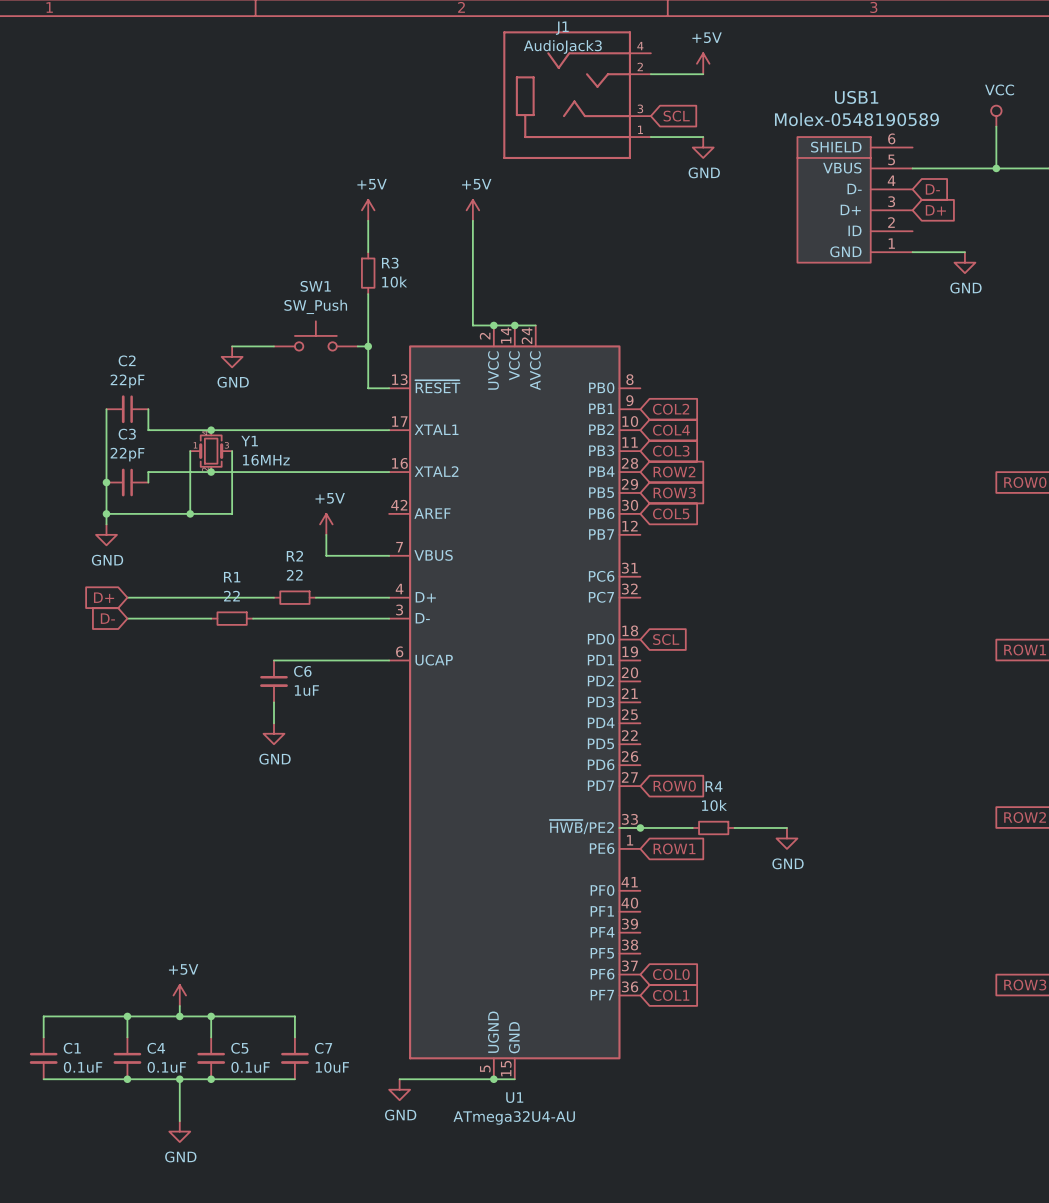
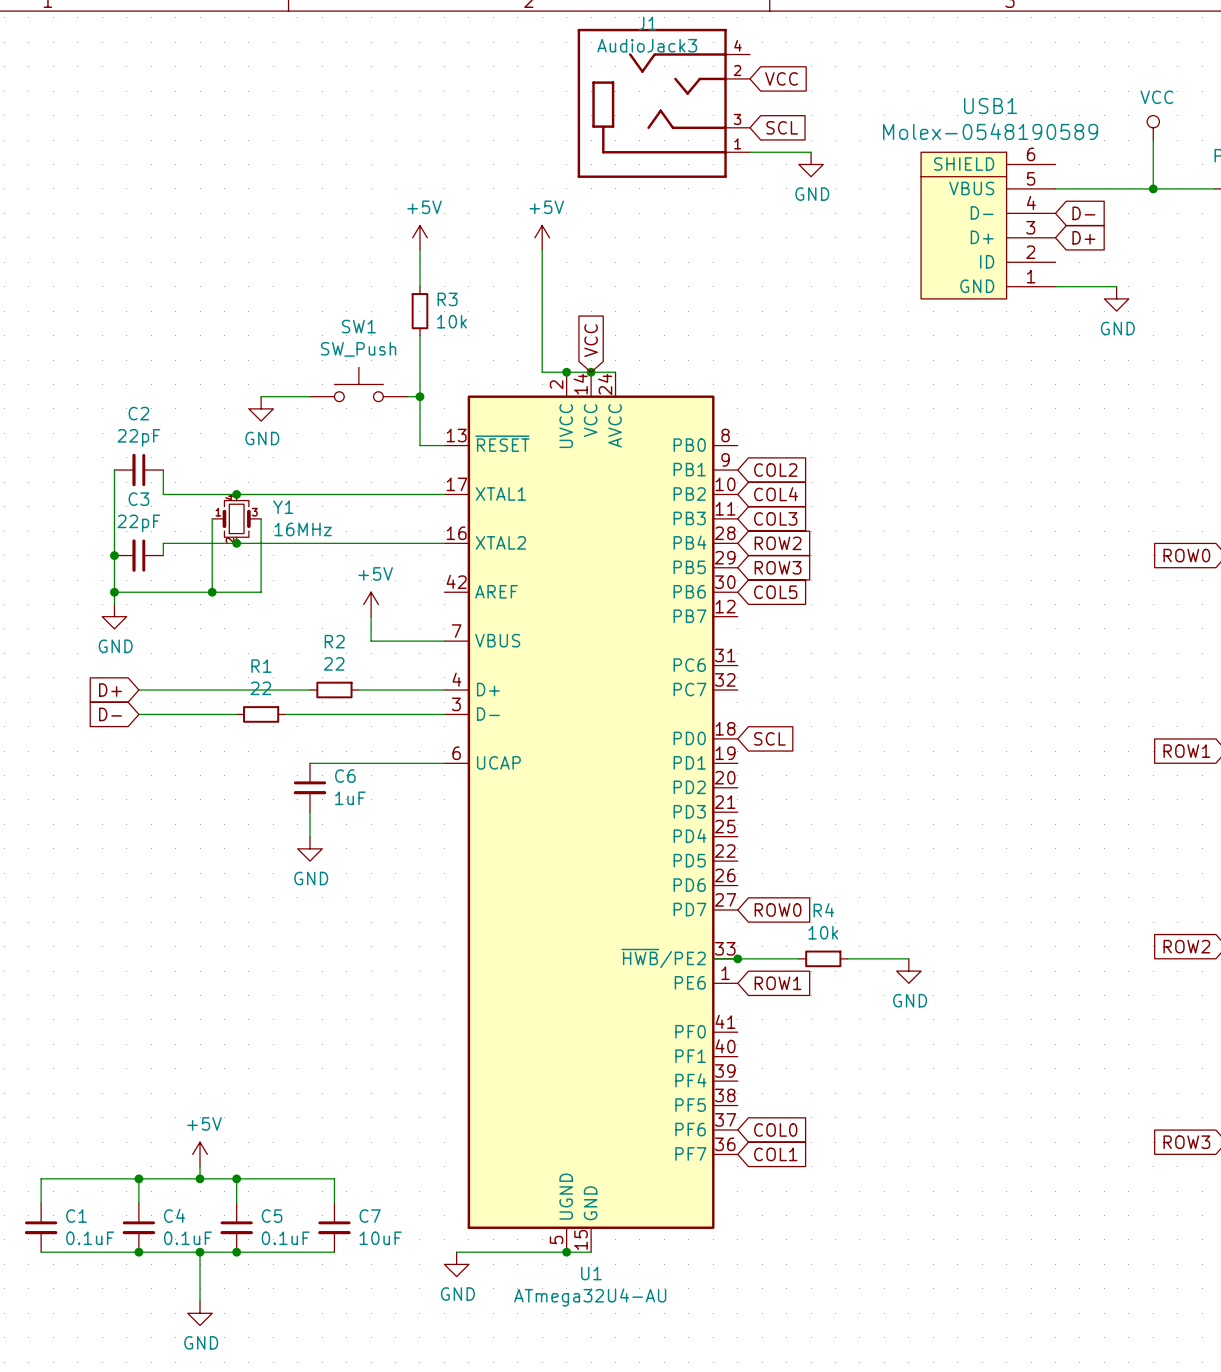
power symbol: +5V (703, 63) -> none
wire: (650, 74) (703, 74) -> none
global label: none -> VCC (781, 78)
global label: none -> VCC (591, 340)

